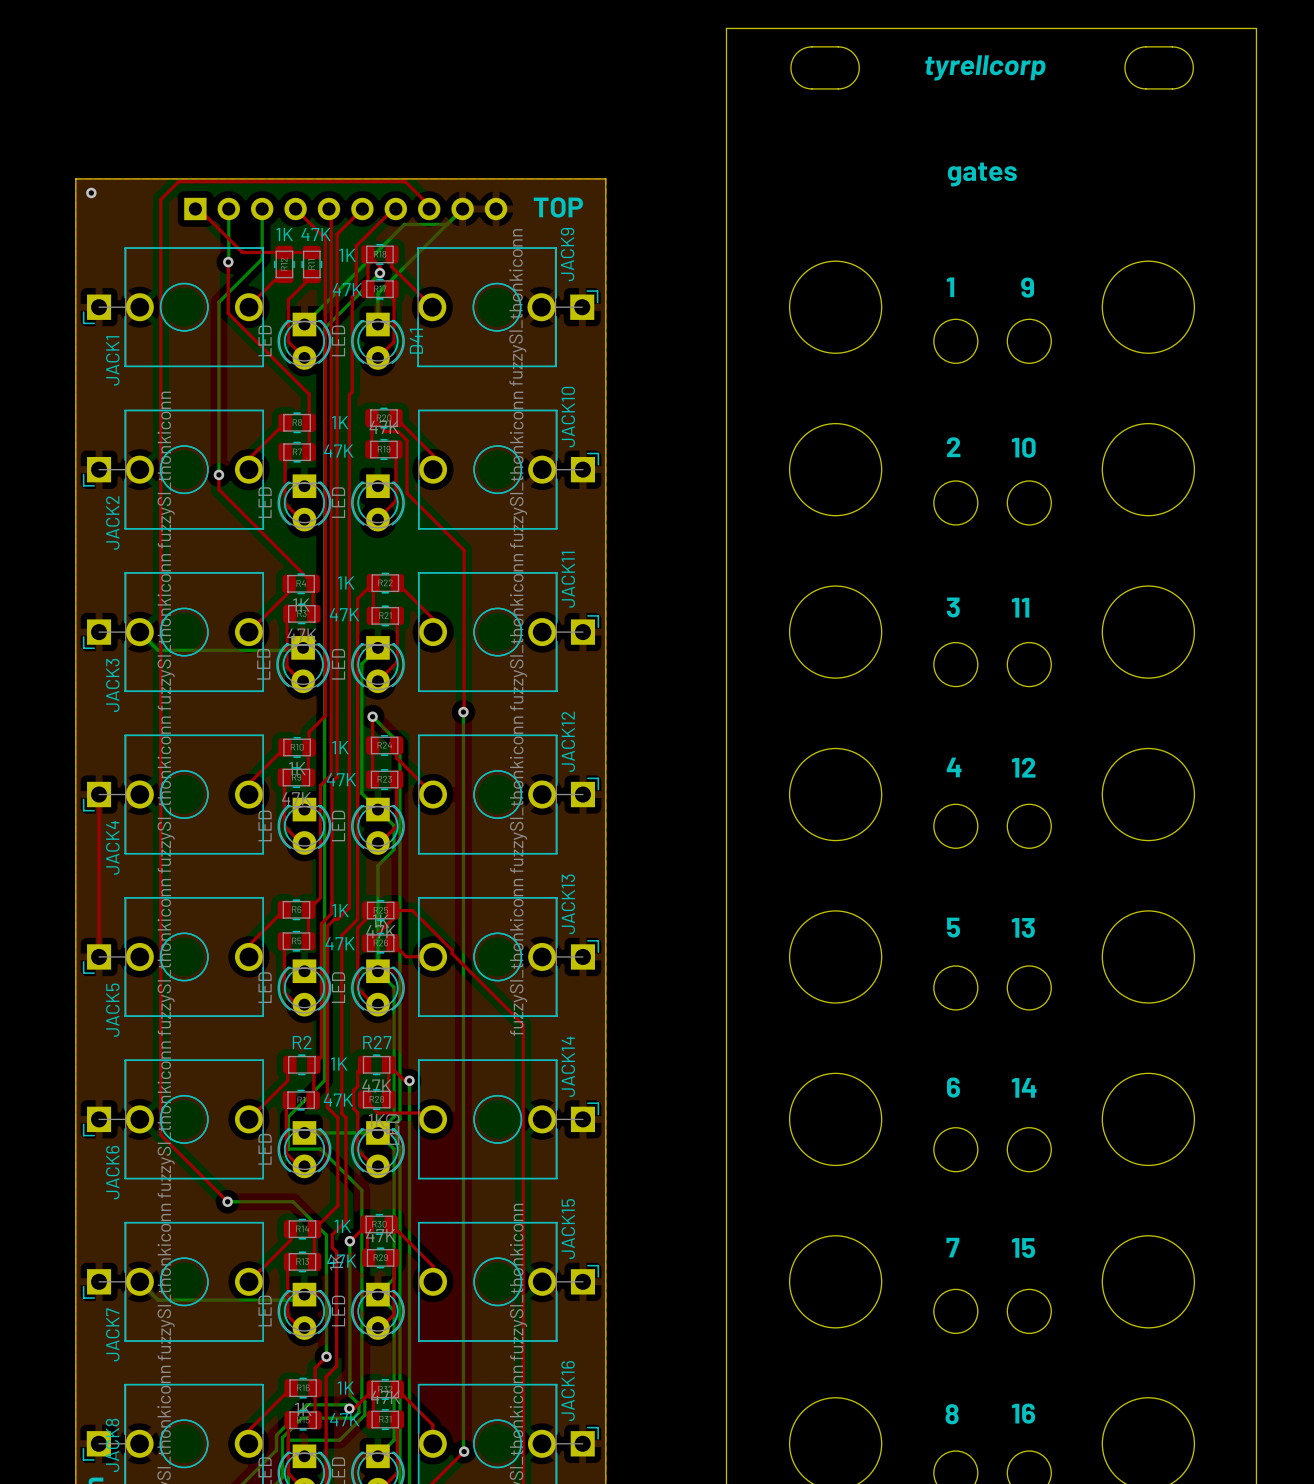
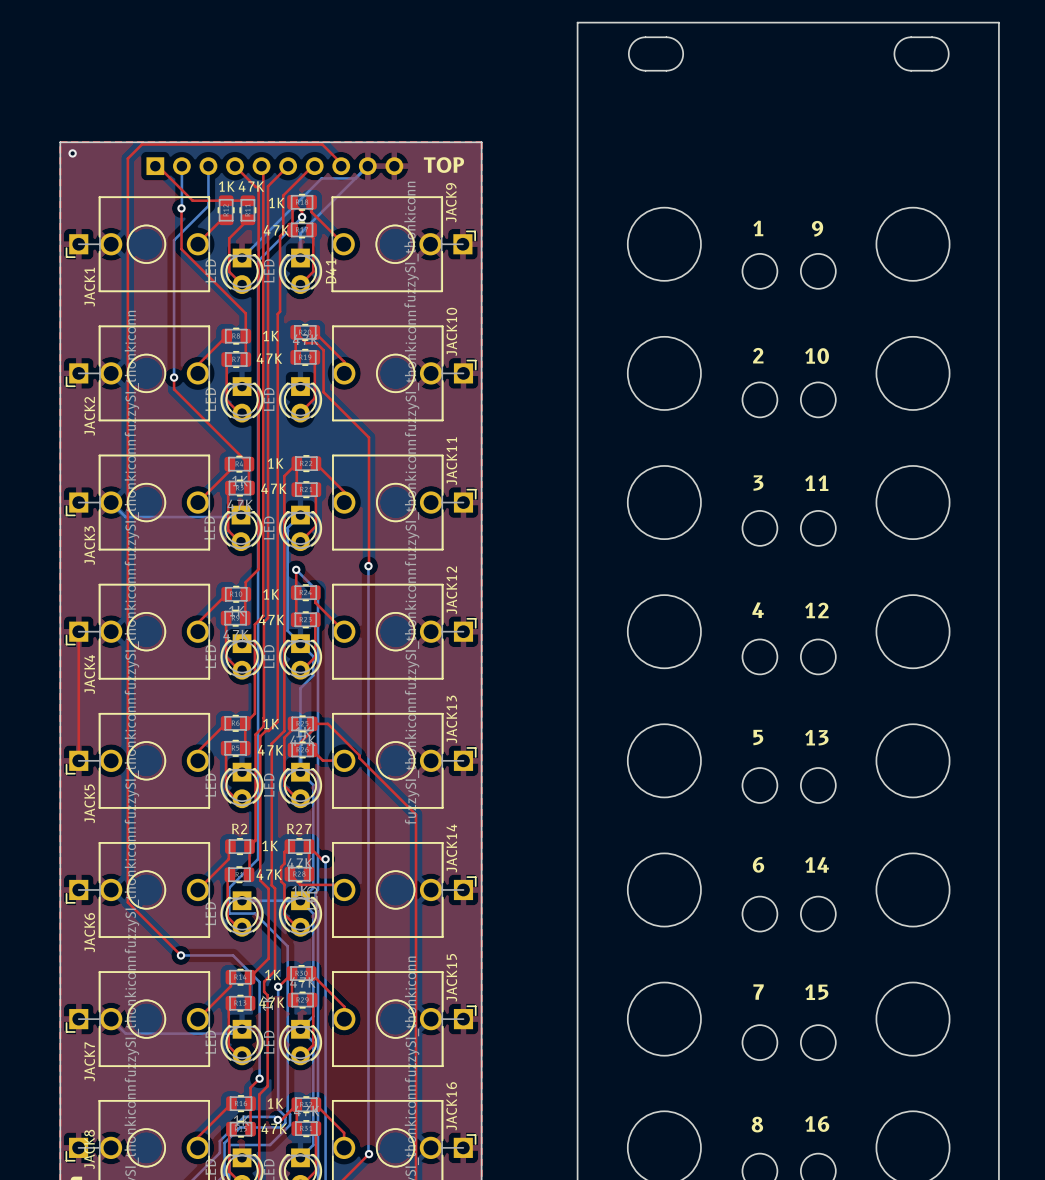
text: tyrellcorp (985, 67) -> none
text: gates (982, 174) -> none

